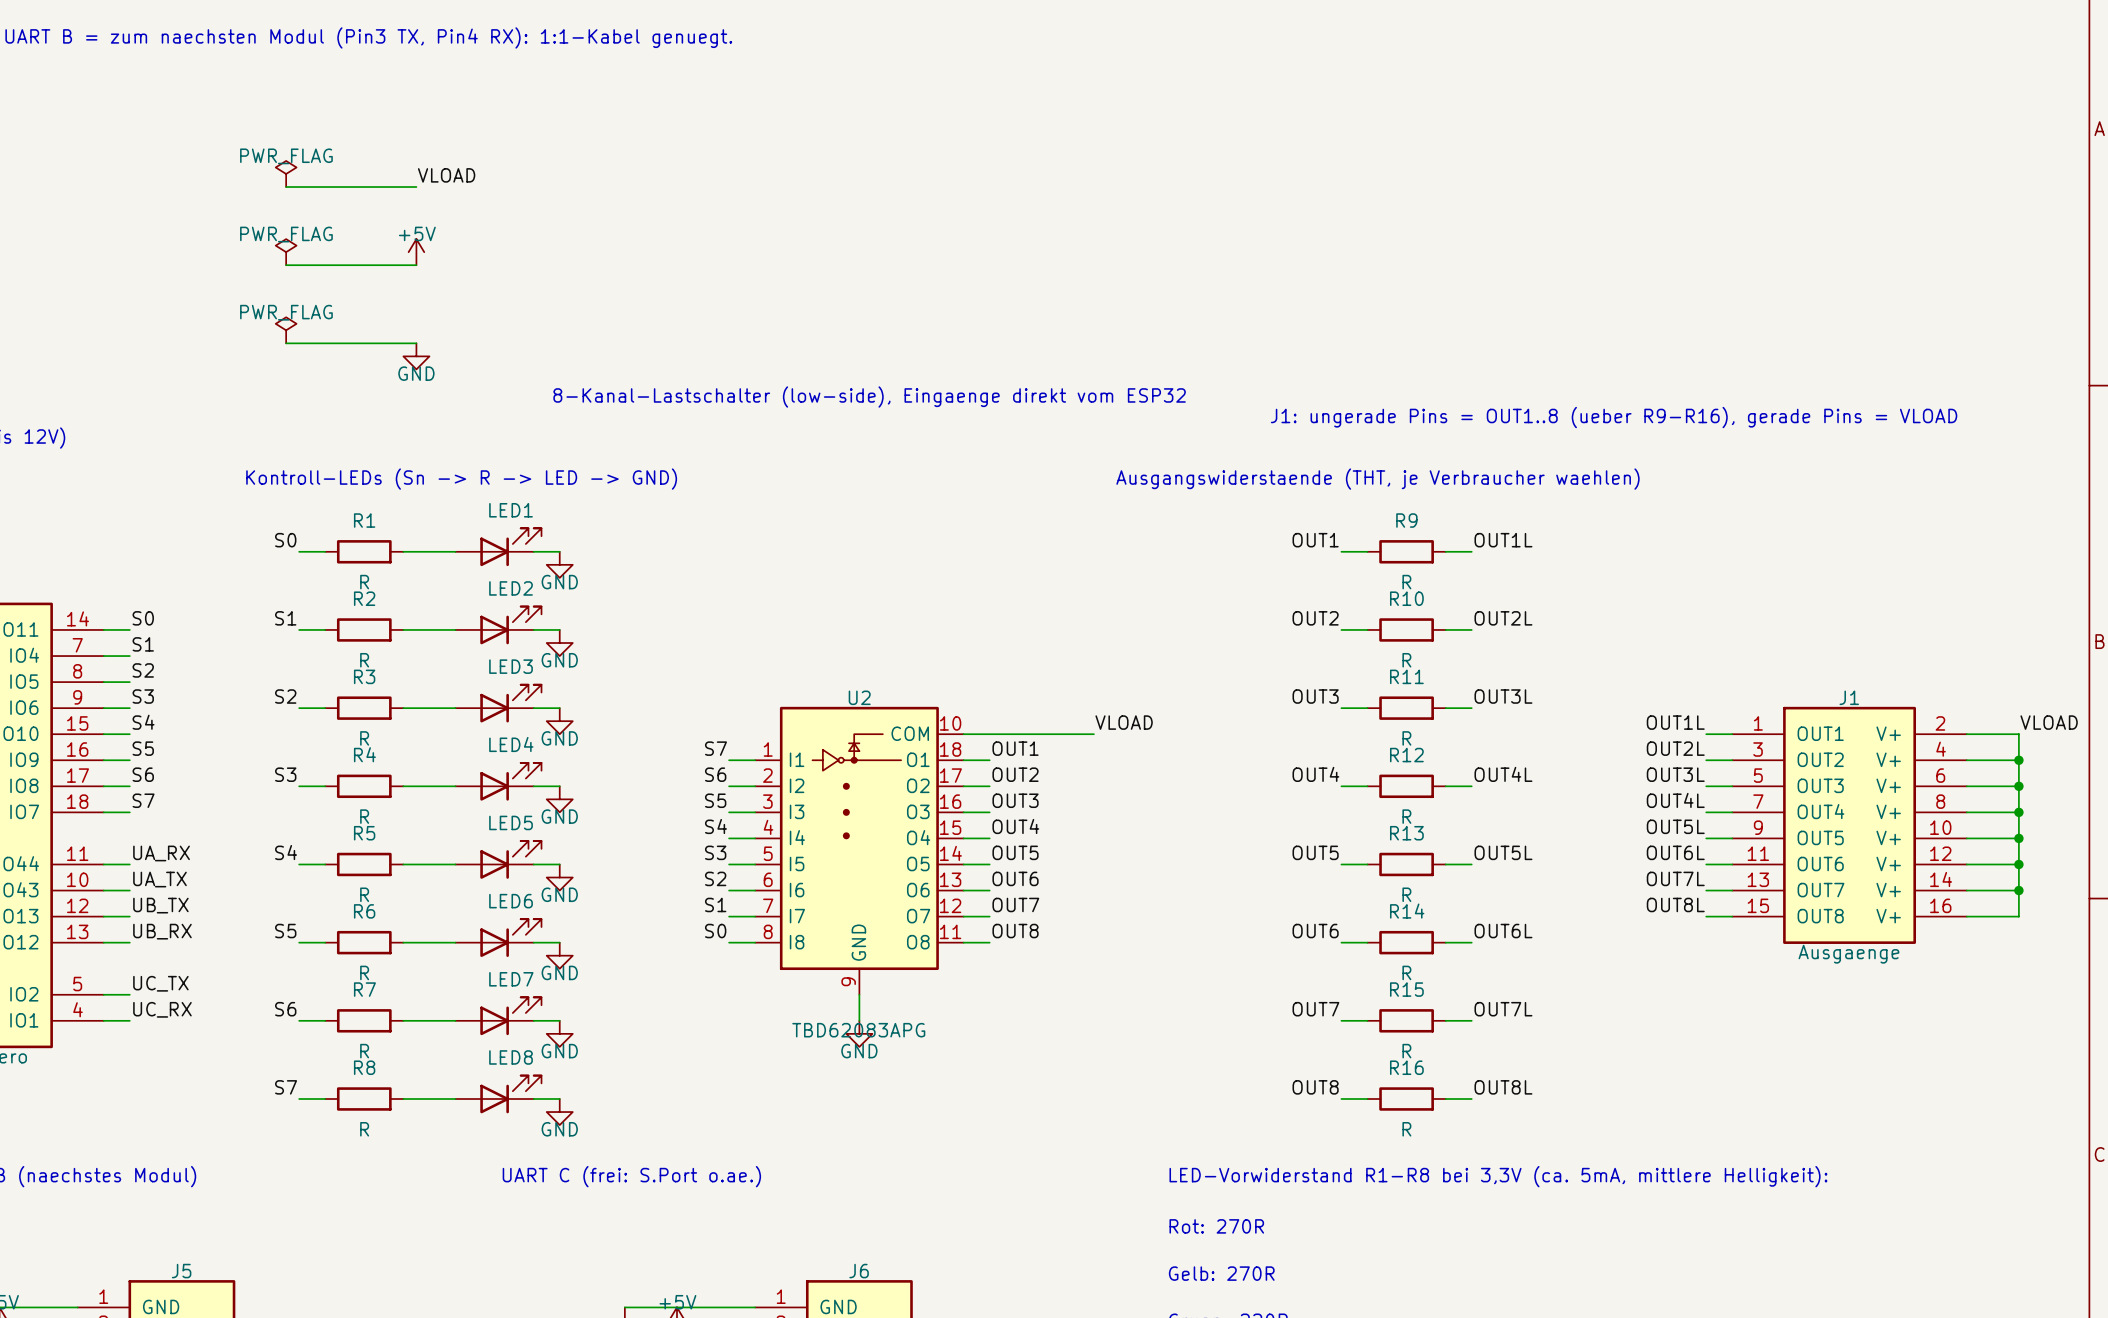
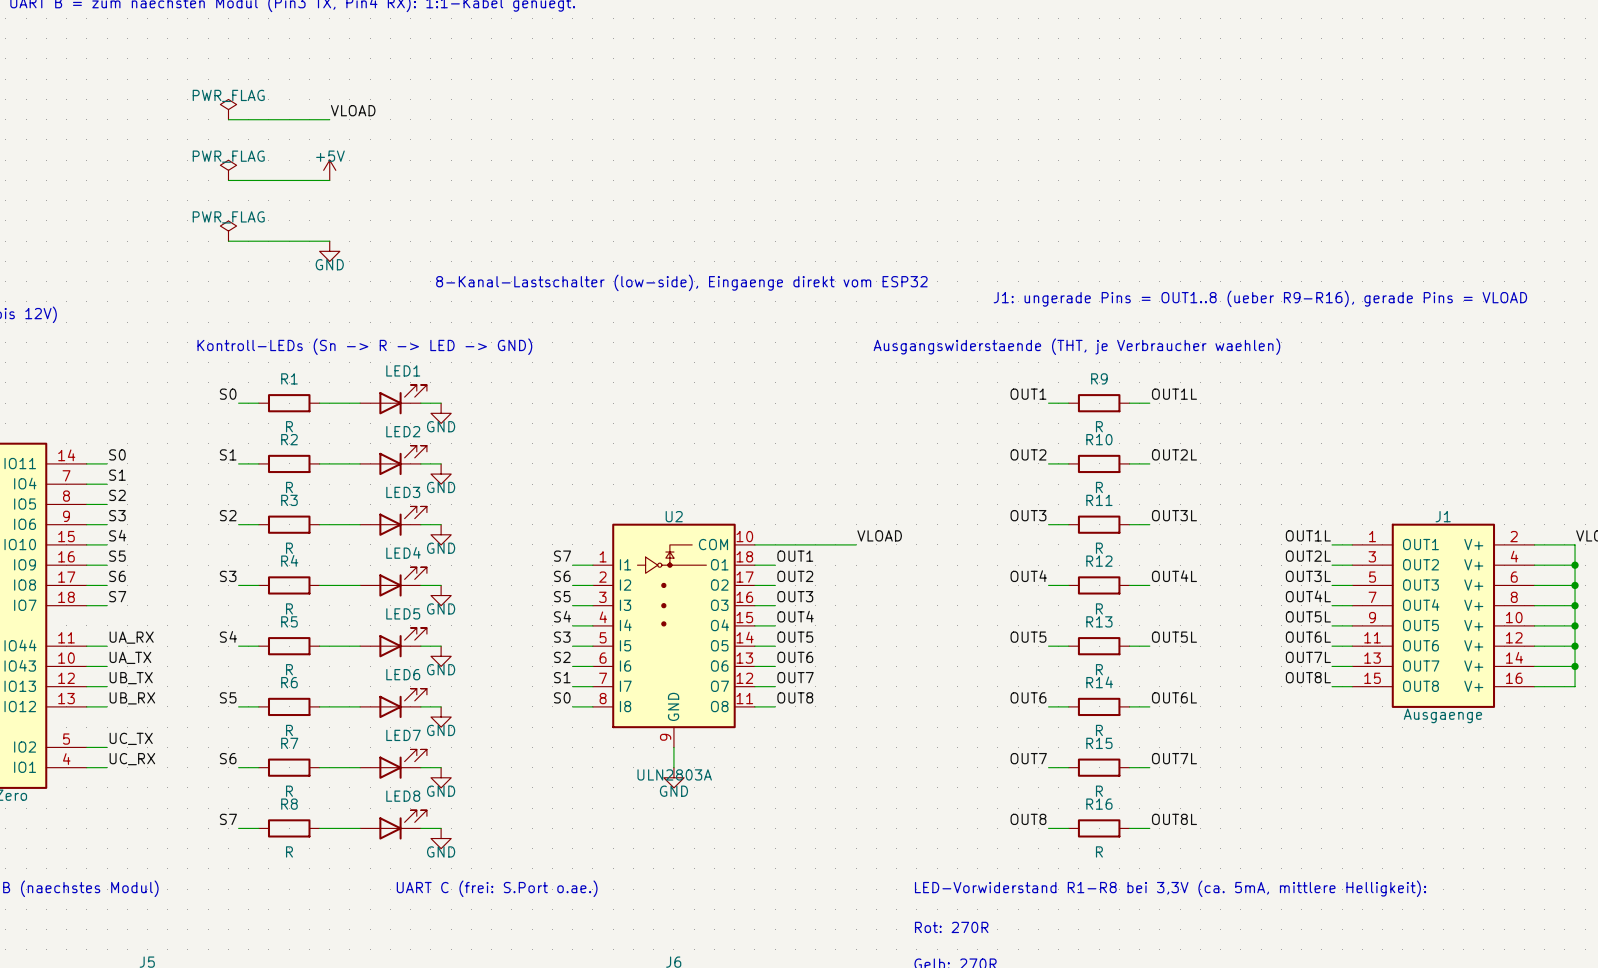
U2 value: TBD62083APG (858, 1030) -> ULN2803A (674, 774)

